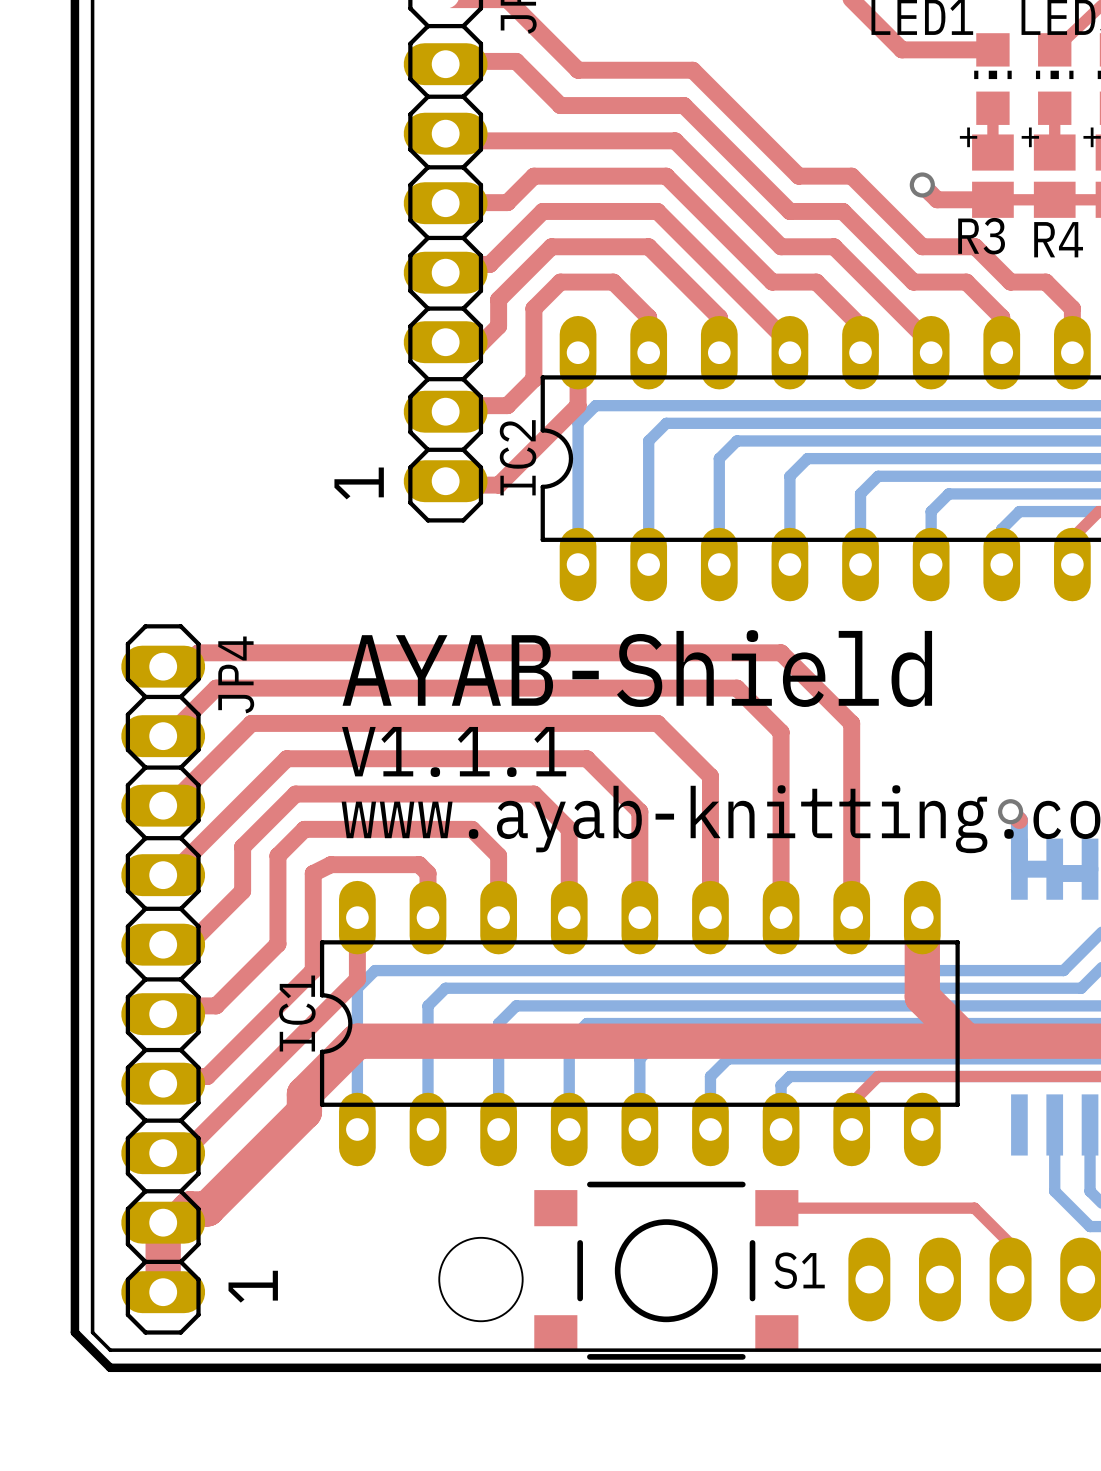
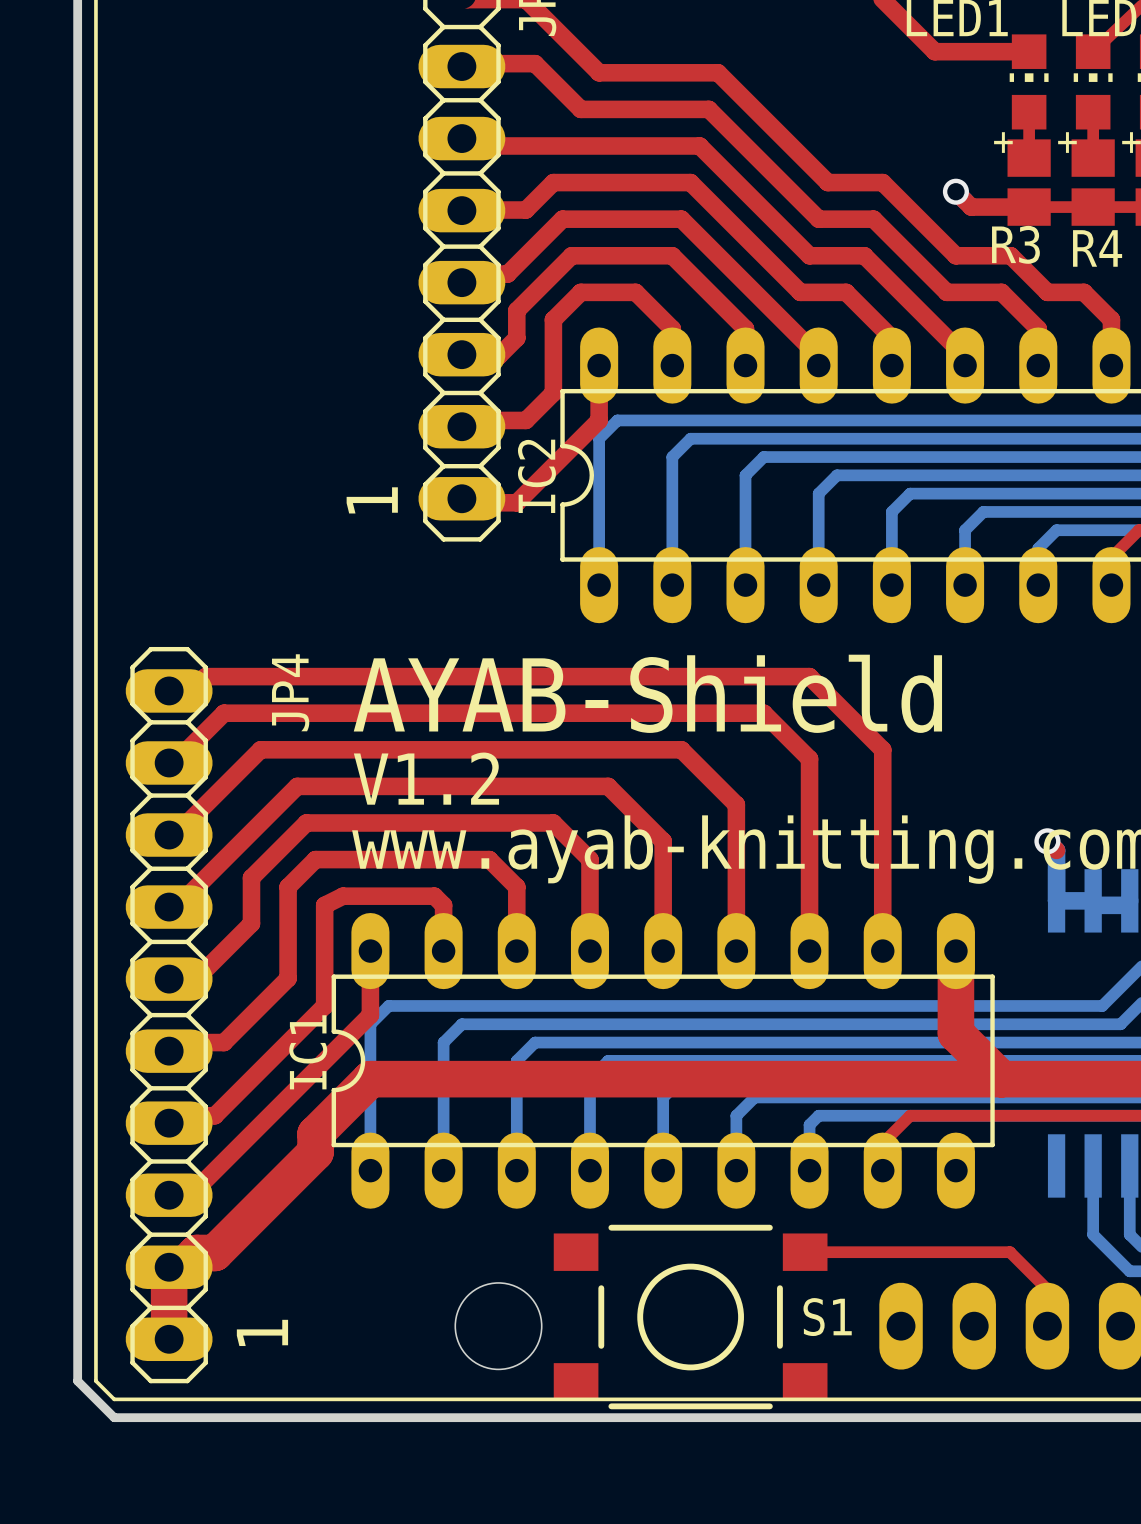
JP4 name position: JP4 (236, 674) -> JP4 (290, 692)
text: V1.1.1 (454, 752) -> V1.2 (426, 778)

